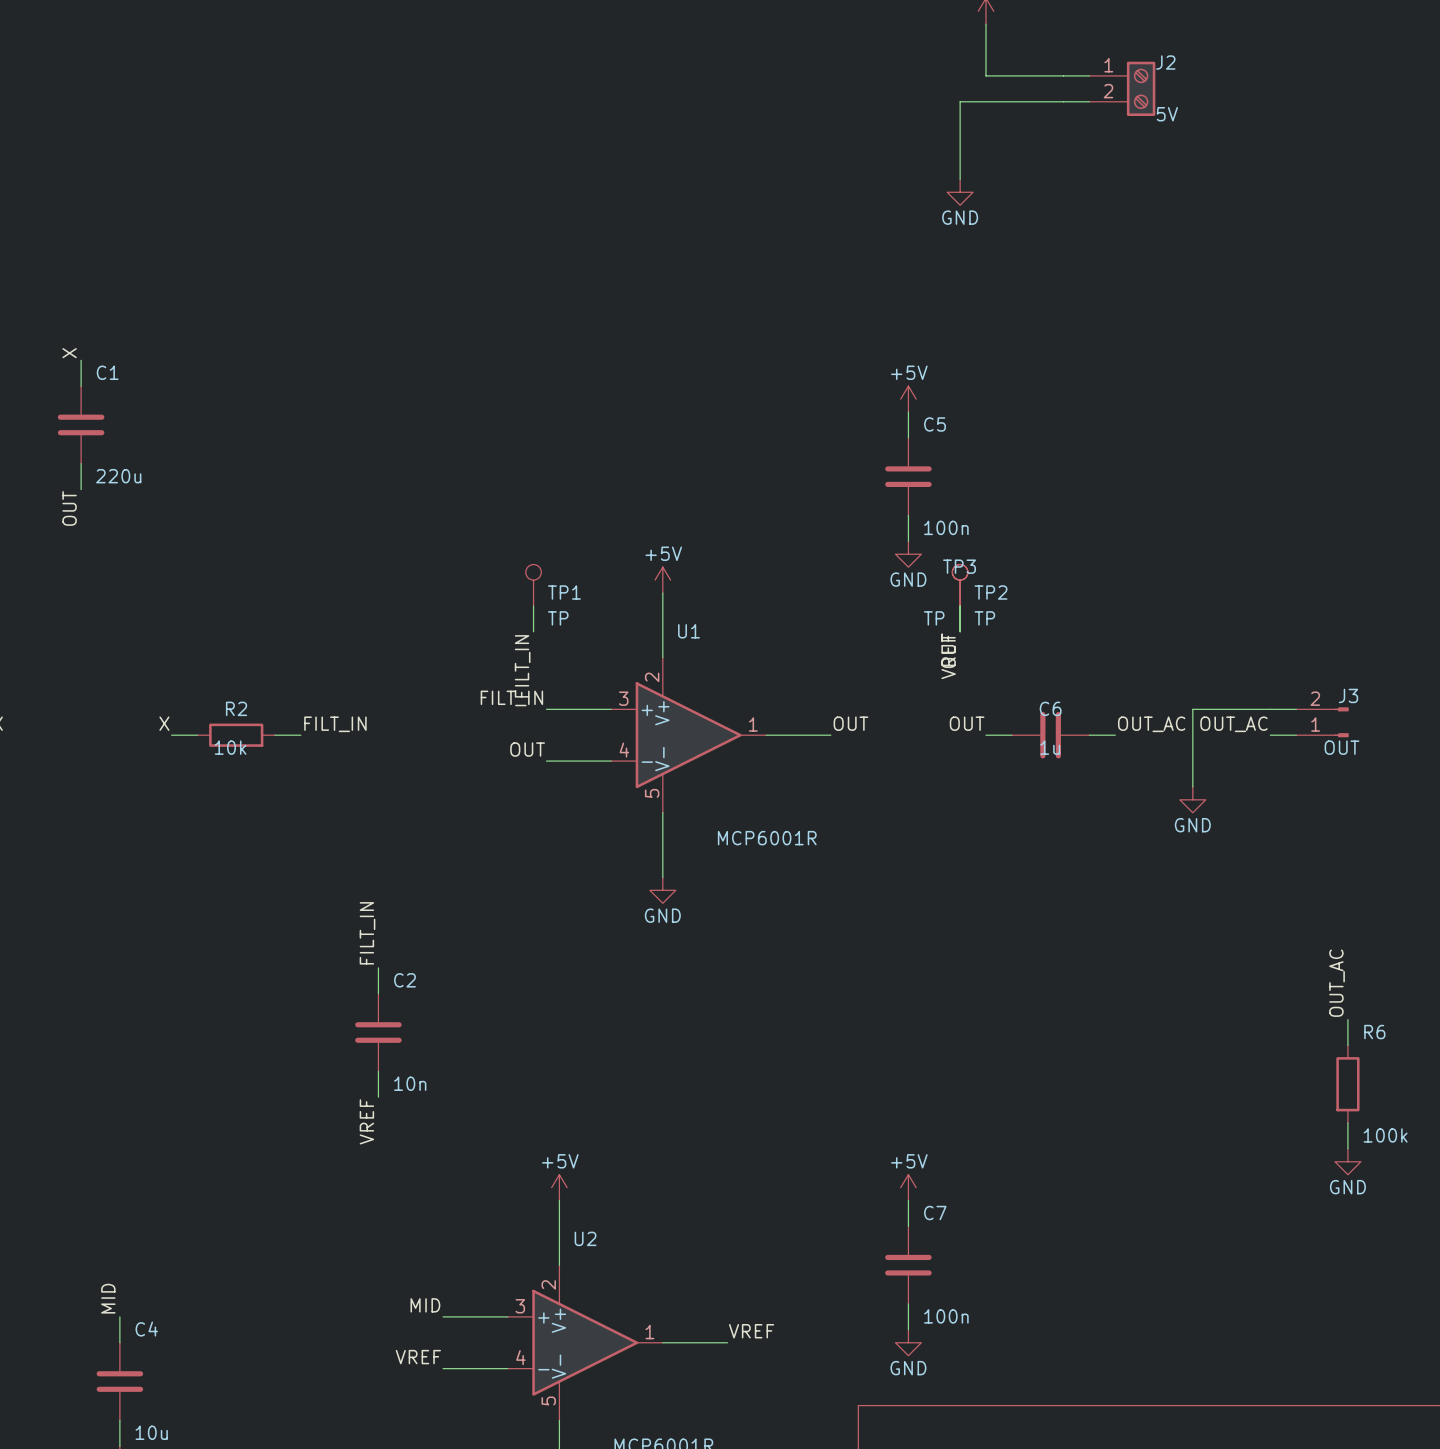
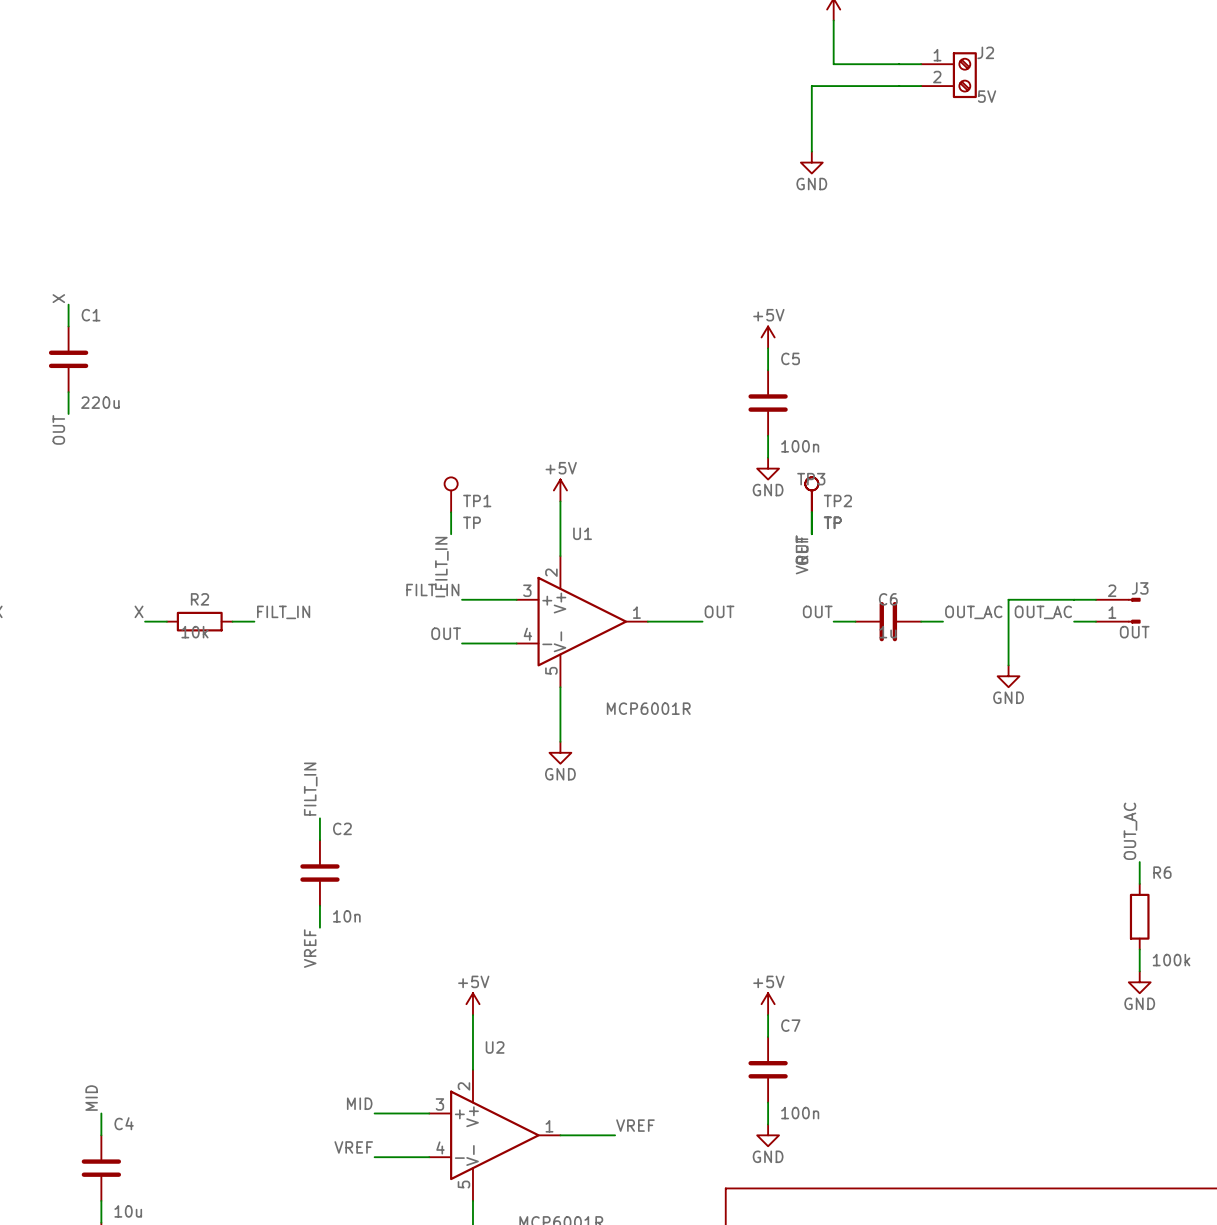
TP3 value position: TP (934, 618) -> TP (832, 522)

